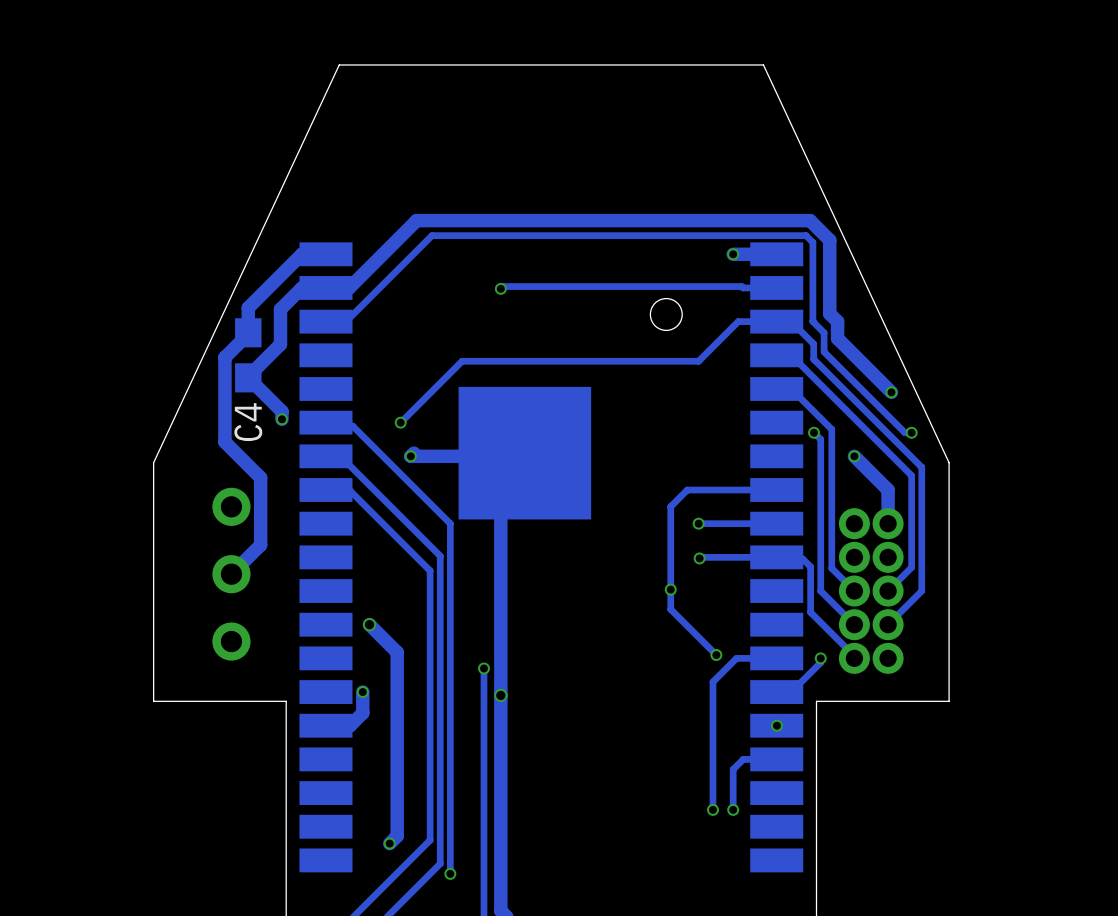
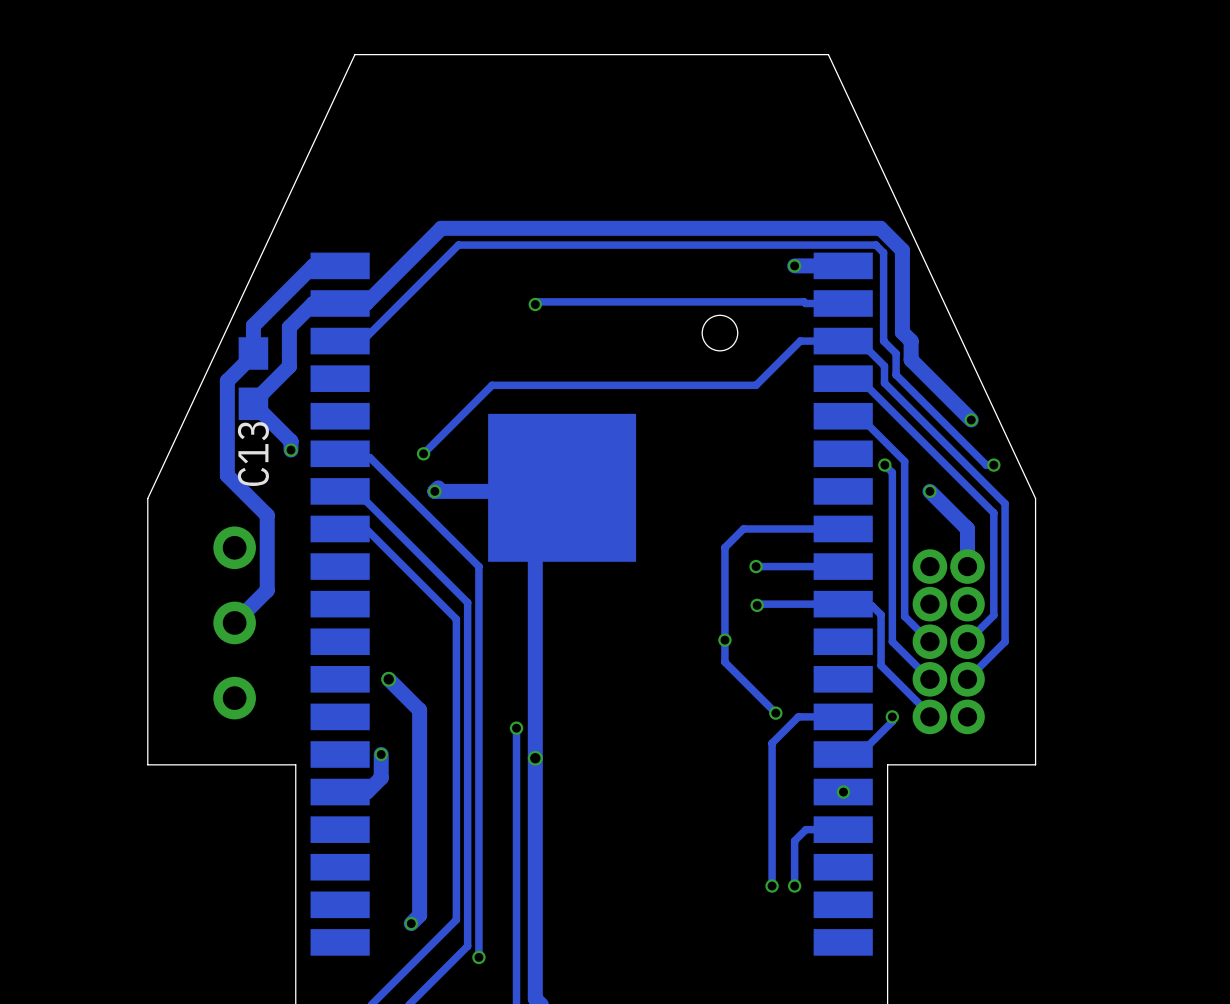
C4 name: C4 (248, 422) -> C13 (253, 454)

